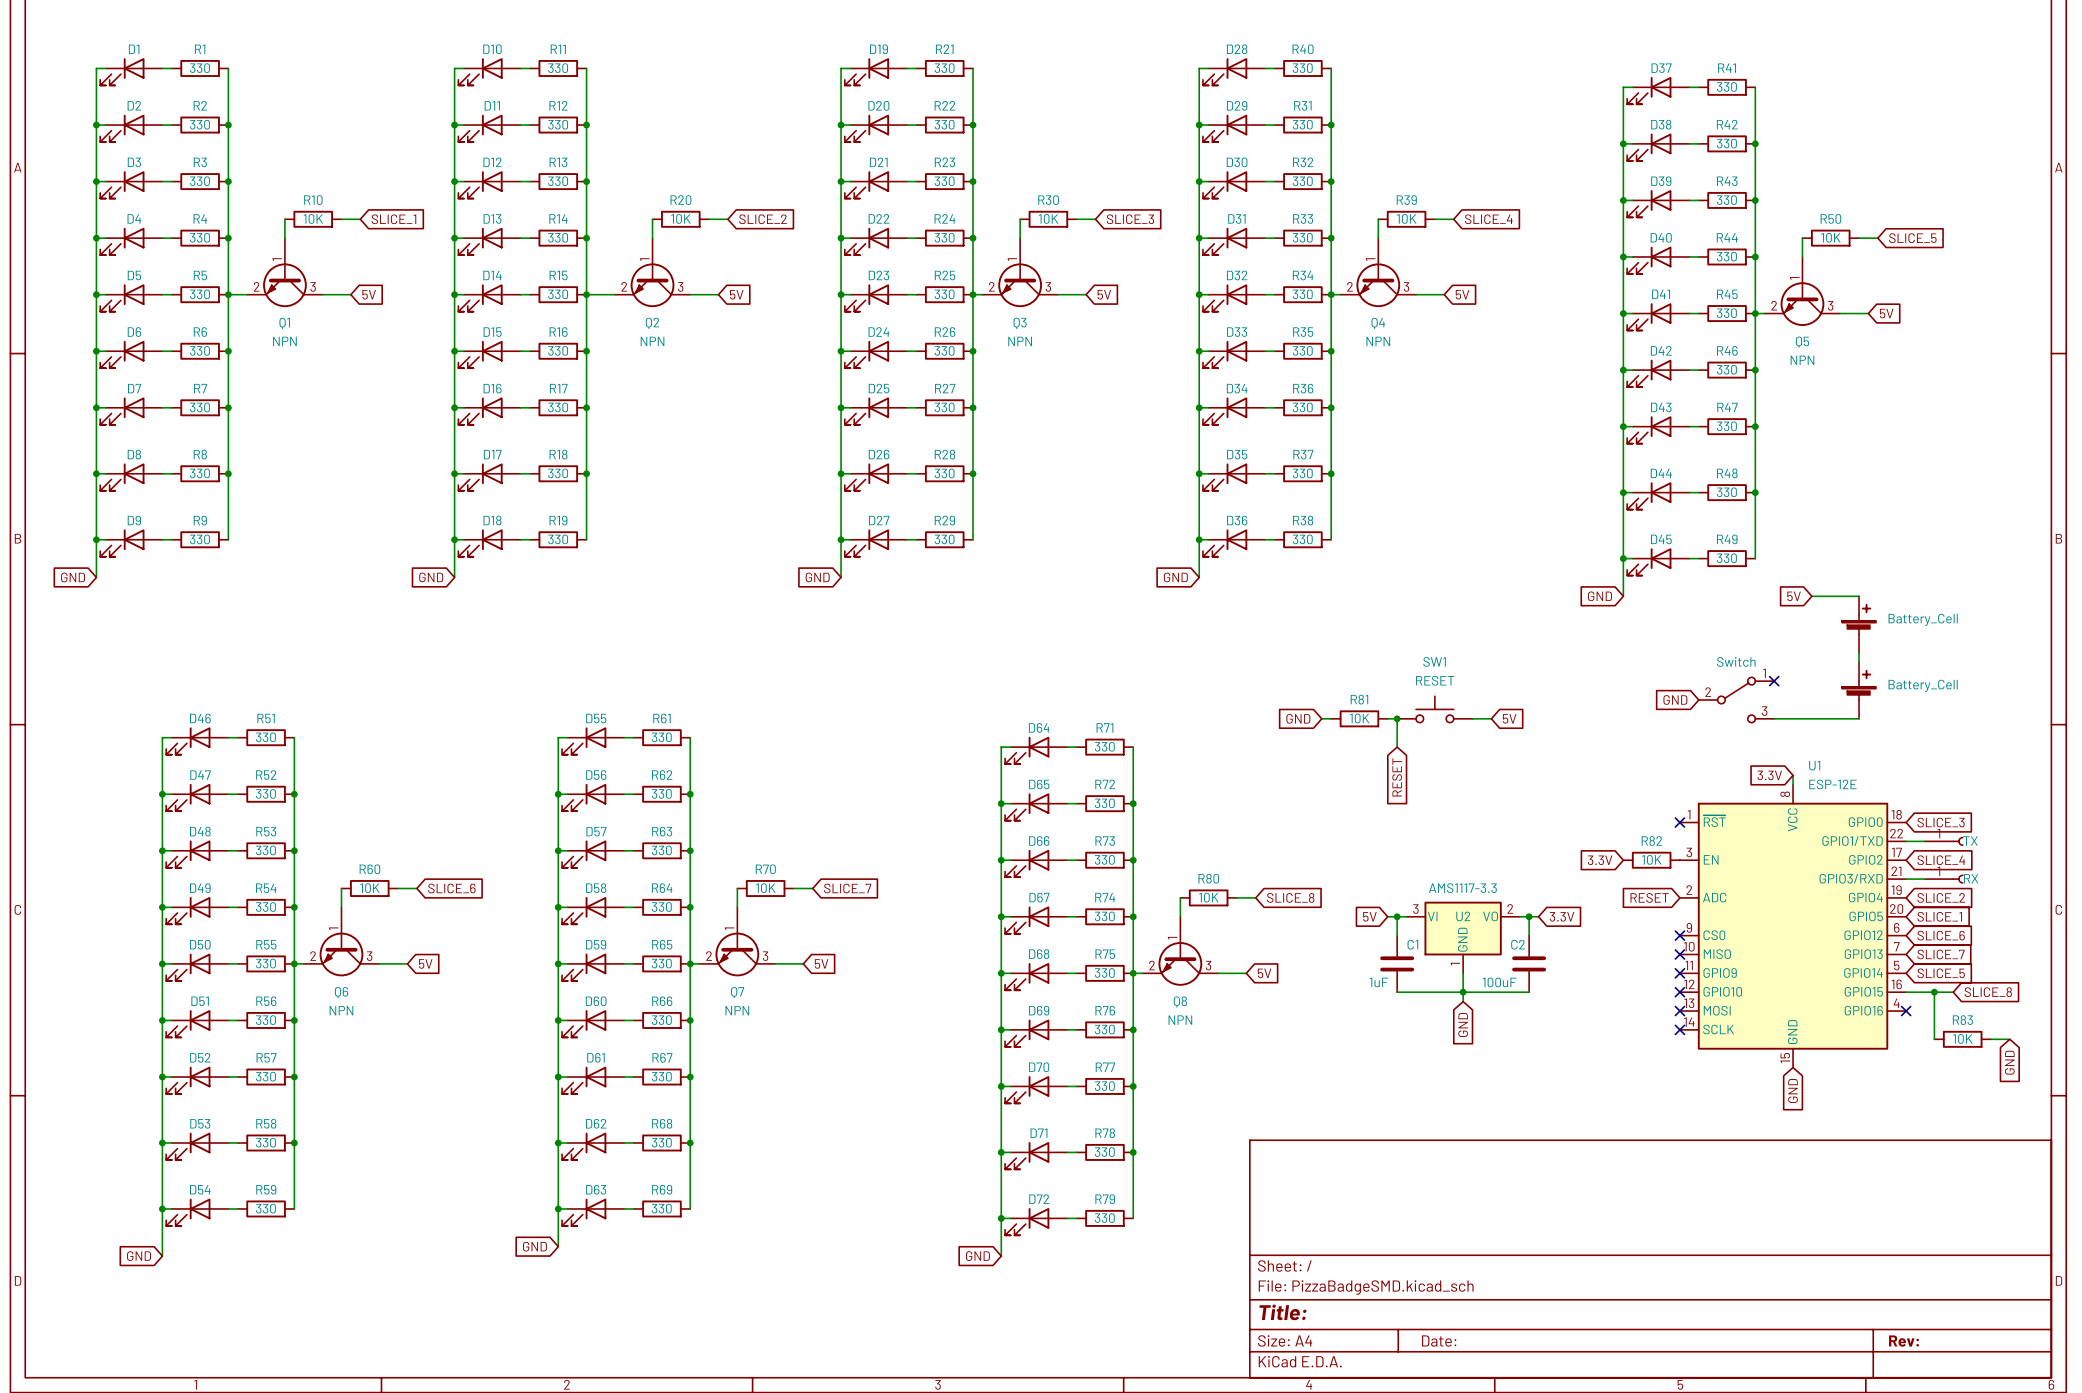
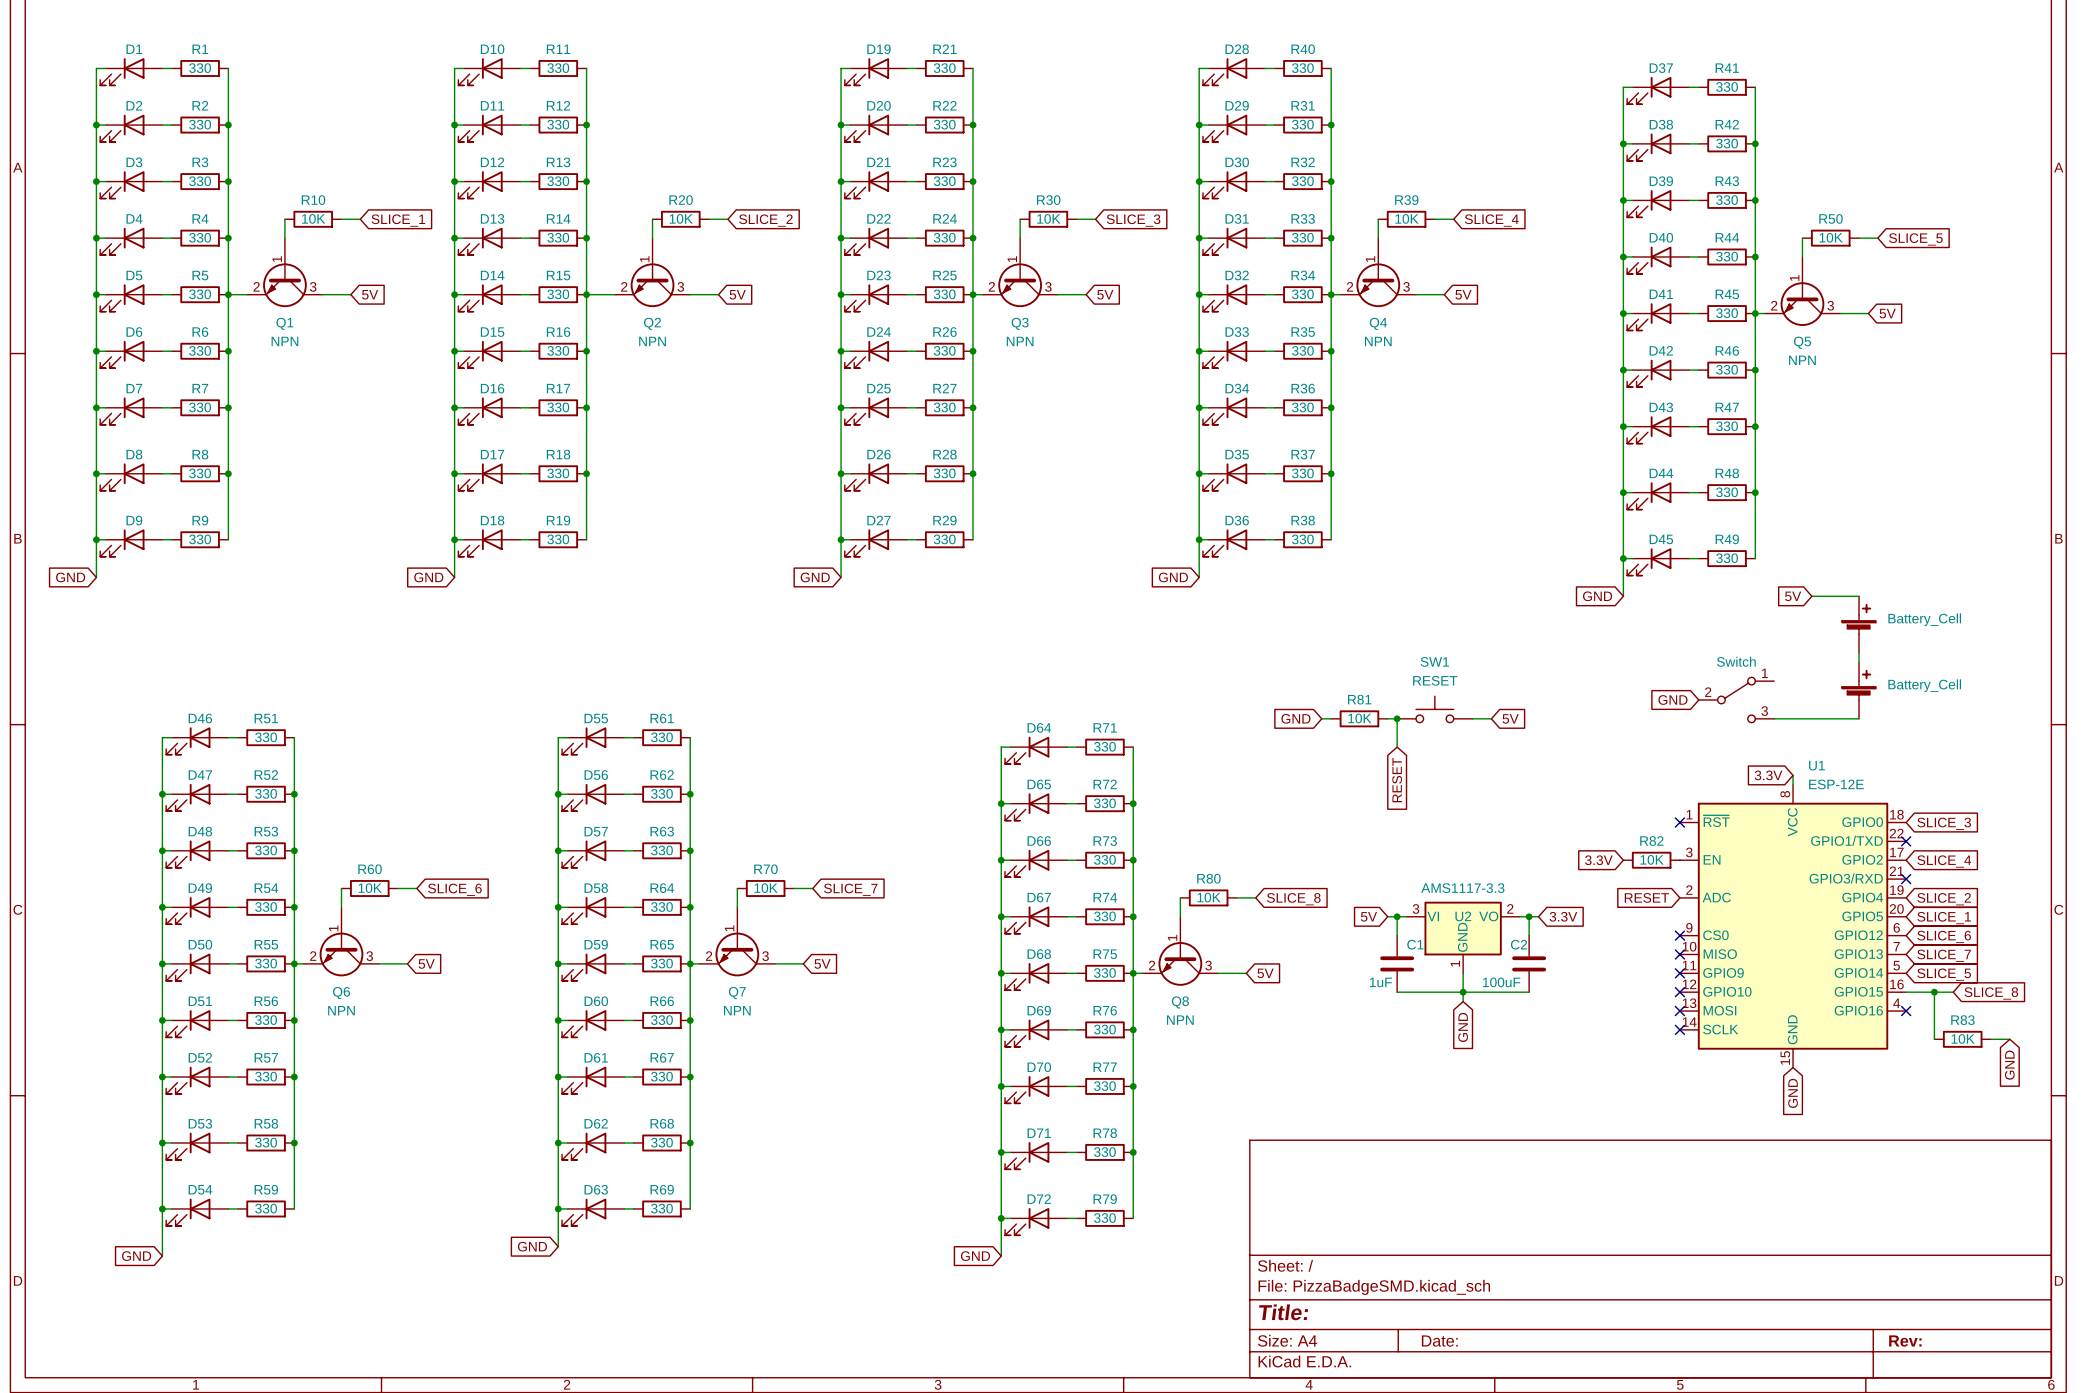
no-connect mark: (1774, 681) -> none
wire: (1906, 841) (1924, 841) -> none
no-connect mark: none -> (1906, 841)
part: TX (1944, 841) -> none
wire: (1906, 879) (1924, 879) -> none
no-connect mark: none -> (1906, 879)
part: RX (1944, 879) -> none

